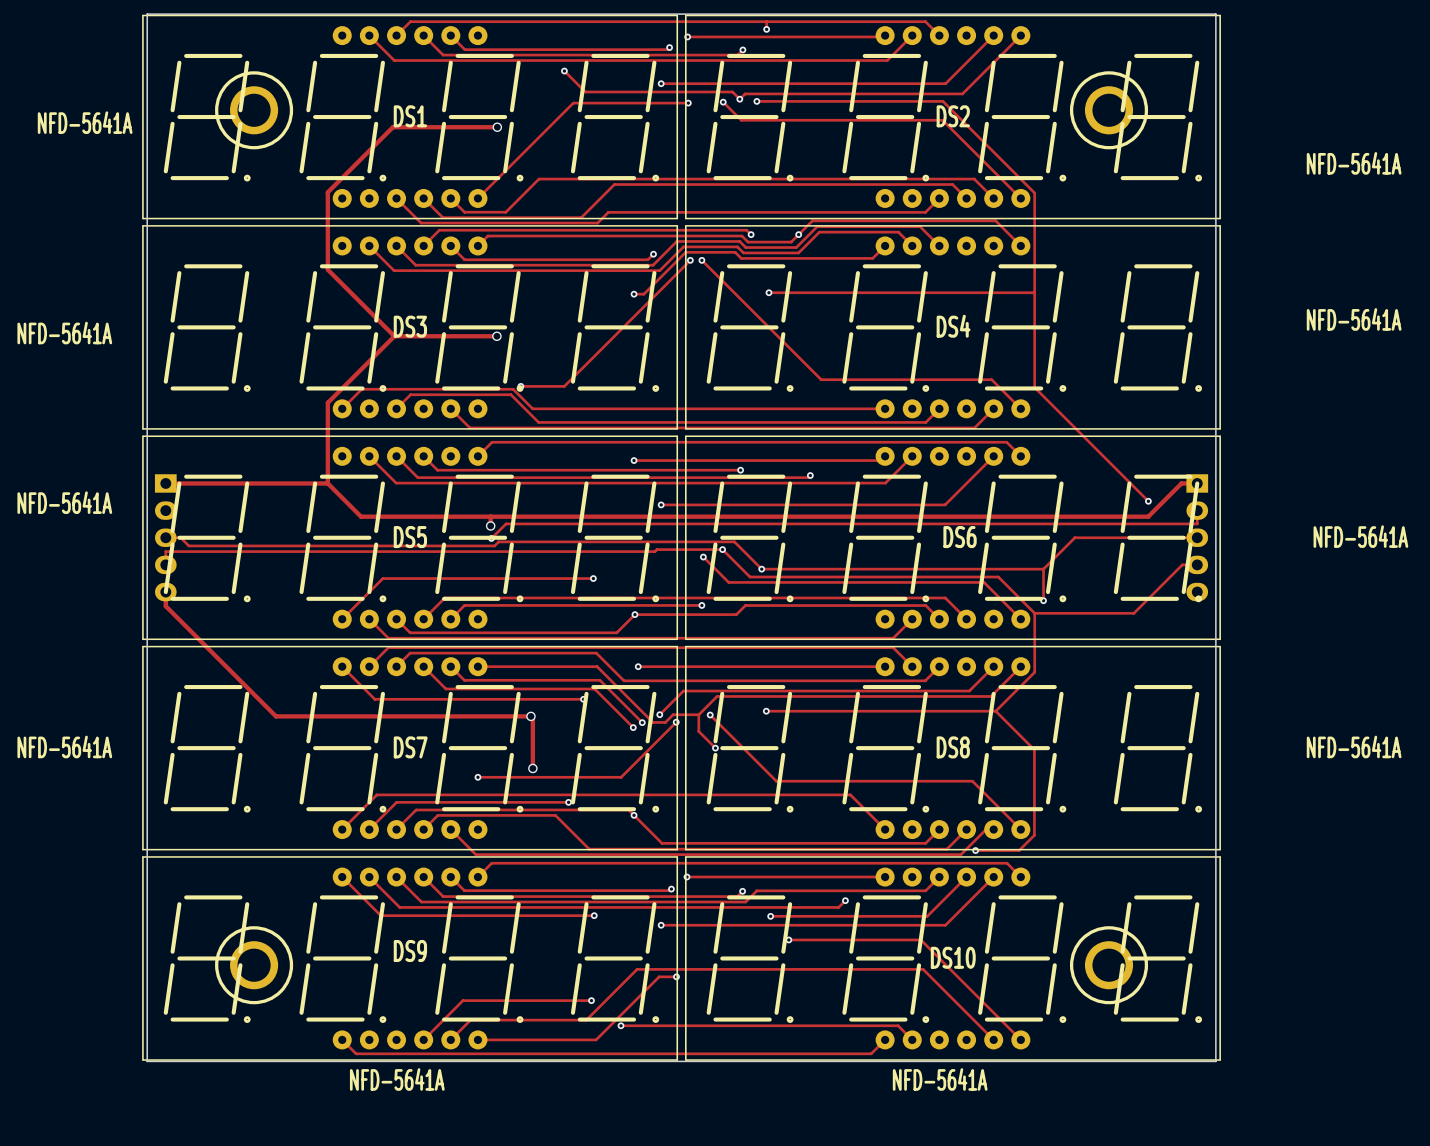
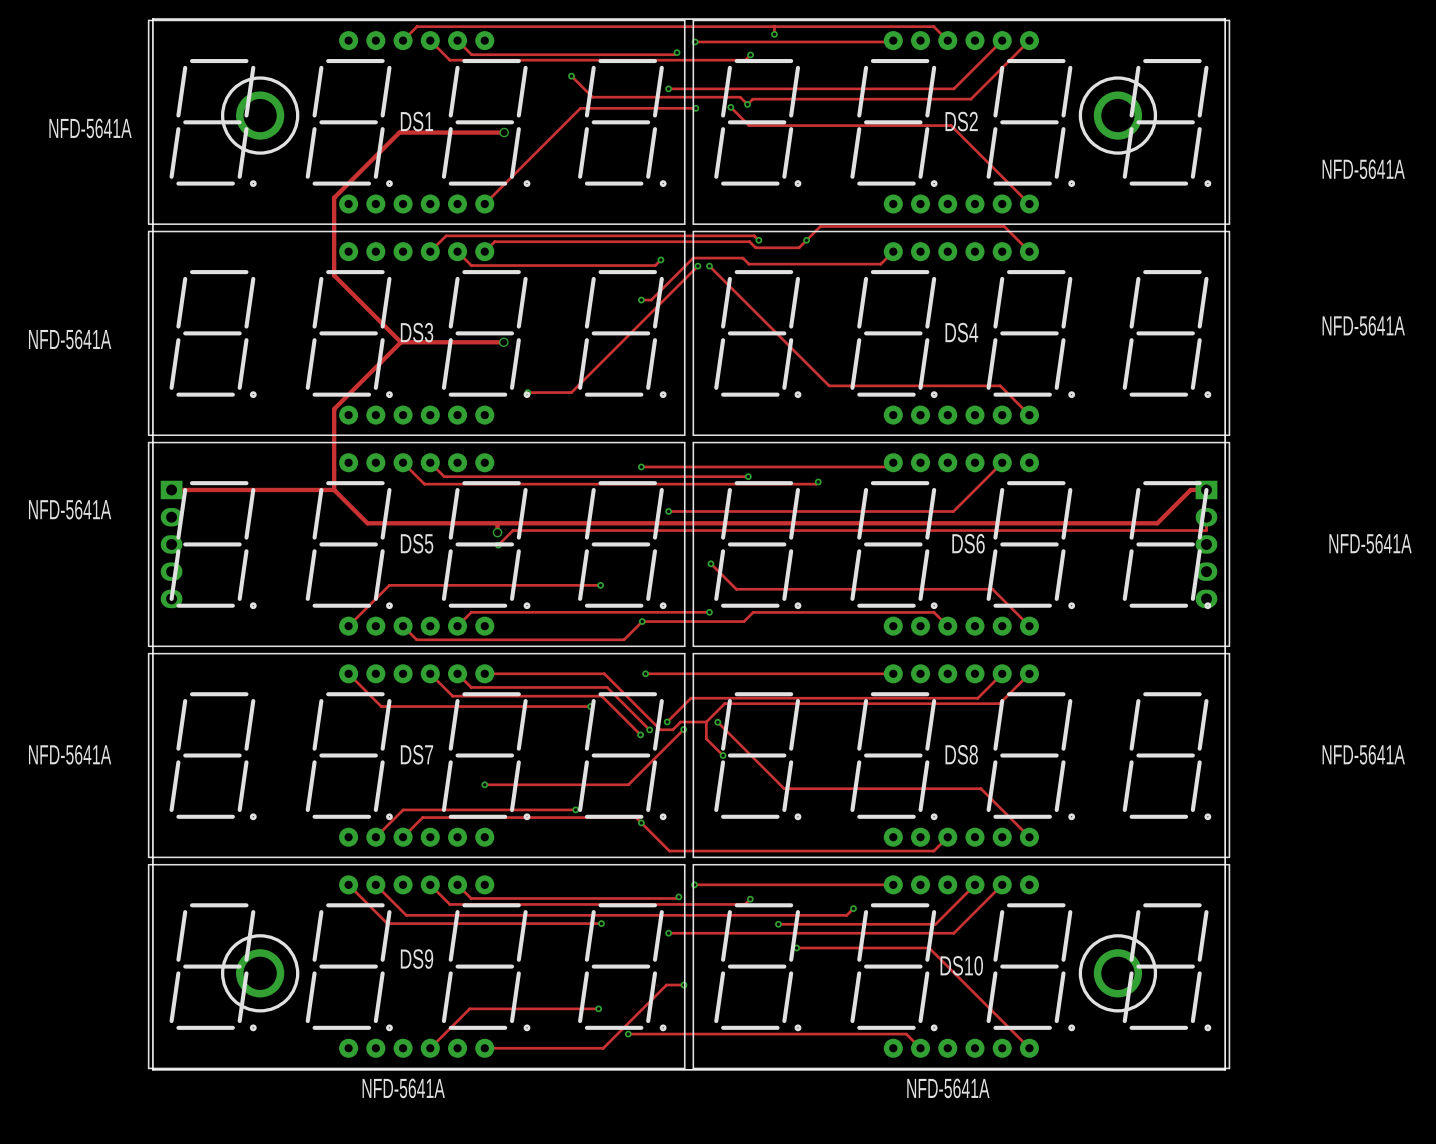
track: (369, 35) (394, 60) (887, 60) (912, 35) -> none
track: (756, 101) (943, 101) (1034, 193) (1034, 387) (1148, 501) -> none
via: (756, 101) -> none
track: (396, 198) (421, 223) (597, 223) (608, 212) (925, 212) (939, 198) -> none
track: (423, 198) (442, 217) (581, 217) (614, 184) (952, 184) (966, 198) -> none
track: (450, 198) (464, 212) (505, 212) (539, 179) (974, 179) (993, 198) -> none
track: (369, 245) (394, 270) (659, 270) (683, 246) (737, 246) (743, 252) (798, 252) (819, 232) (898, 232) (912, 245) -> none
track: (396, 245) (415, 265) (653, 265) (676, 241) (739, 241) (745, 247) (796, 247) (817, 226) (920, 226) (939, 245) -> none
track: (768, 292) (1034, 292) -> none
via: (768, 292) -> none
track: (342, 408) (361, 389) (513, 389) (532, 408) (885, 408) -> none
track: (396, 408) (410, 394) (510, 394) (538, 422) (925, 422) (939, 408) -> none
track: (450, 408) (469, 427) (974, 427) (993, 408) -> none
track: (369, 456) (396, 483) (885, 483) (912, 456) -> none
track: (477, 456) (492, 442) (1006, 442) (1020, 456) -> none
via: (1148, 501) -> none
track: (165, 537) (180, 537) (188, 545) (494, 545) (498, 541) (734, 541) (761, 569) (1043, 569) -> none
track: (1197, 537) (1074, 537) (1043, 569) -> none
via: (722, 549) -> none
track: (165, 564) (165, 551) (655, 551) (657, 549) (722, 549) (750, 577) (998, 577) (1034, 613) -> none
track: (1197, 564) (1182, 564) (1133, 613) (1034, 613) -> none
via: (761, 569) -> none
track: (1043, 569) (1043, 600) -> none
track: (165, 592) (165, 606) (276, 716) (530, 716) (532, 718) (532, 768) -> none
via: (1043, 600) -> none
track: (1034, 613) (1034, 672) (995, 711) -> none
track: (369, 619) (388, 638) (893, 638) (912, 619) -> none
track: (423, 619) (444, 597) (945, 597) (966, 619) -> none
track: (369, 666) (388, 647) (893, 647) (912, 666) -> none
track: (396, 666) (410, 653) (596, 653) (624, 680) (925, 680) (939, 666) -> none
track: (766, 711) (995, 711) -> none
via: (766, 711) -> none
track: (995, 711) (1034, 749) (1034, 835) (1019, 850) (975, 850) -> none
via: (530, 716) -> none
via: (532, 768) -> none
track: (342, 829) (376, 794) (850, 794) (885, 829) -> none
track: (423, 829) (437, 815) (555, 815) (589, 849) (946, 849) (966, 829) -> none
track: (450, 829) (475, 854) (960, 854) (986, 829) (993, 829) -> none
via: (975, 850) -> none
track: (396, 877) (421, 902) (745, 902) (756, 890) (925, 890) (939, 877) -> none
track: (477, 877) (491, 863) (1007, 863) (1020, 877) -> none
track: (342, 1039) (356, 1053) (871, 1053) (885, 1039) -> none
track: (450, 1039) (470, 1020) (586, 1020) (637, 969) (923, 969) (993, 1039) -> none

